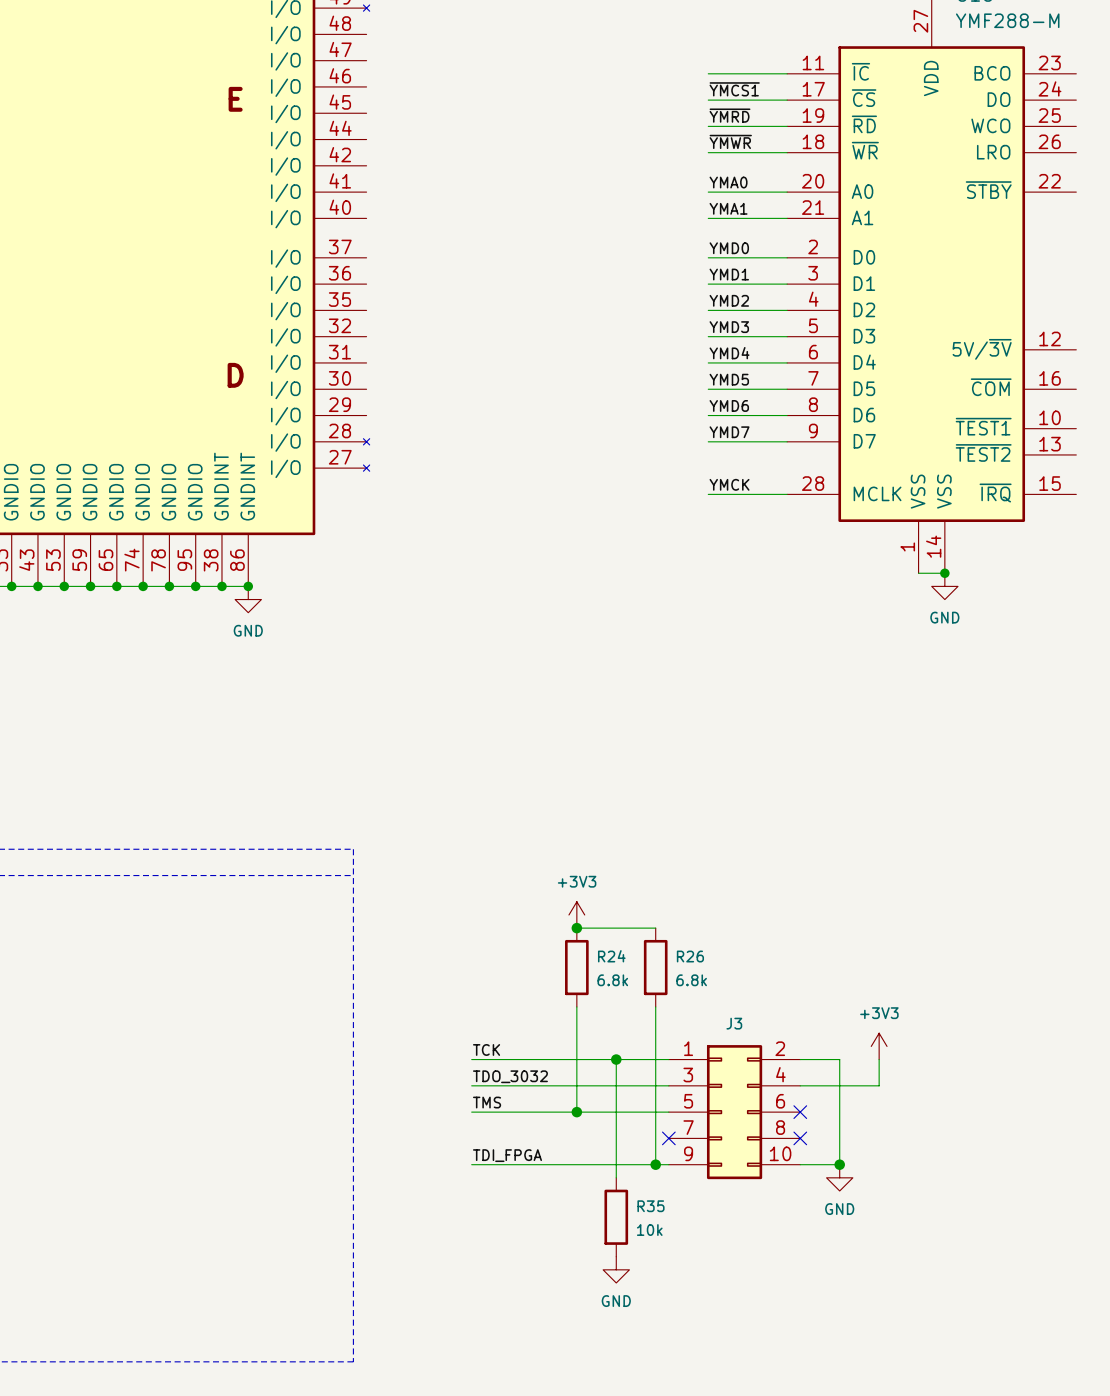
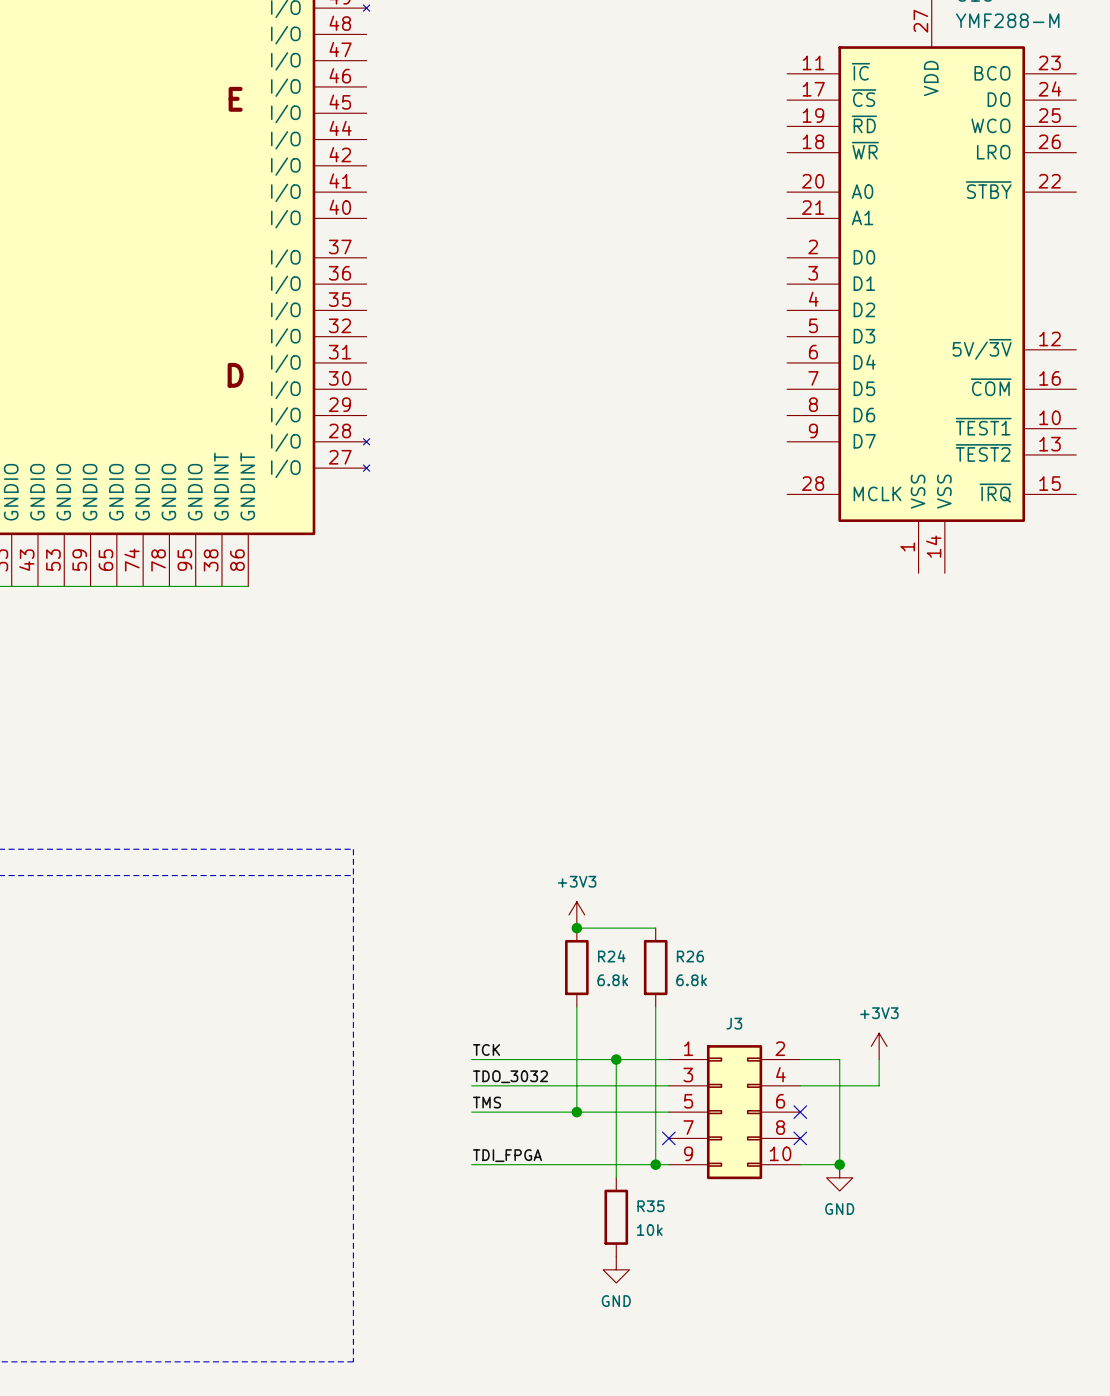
wire: (708, 73) (787, 73) -> none
label: ~{YMCS1} (734, 89) -> none
wire: (708, 100) (787, 100) -> none
label: ~{YMRD} (729, 115) -> none
wire: (708, 126) (787, 126) -> none
label: ~{YMWR} (730, 141) -> none
wire: (708, 152) (787, 152) -> none
label: YMA0 (728, 182) -> none
wire: (708, 192) (787, 192) -> none
label: YMA1 (728, 208) -> none
wire: (708, 218) (787, 218) -> none
label: YMD0 (729, 248) -> none
wire: (708, 257) (787, 257) -> none
label: YMD1 (729, 274) -> none
wire: (708, 284) (787, 284) -> none
label: YMD2 (729, 300) -> none
wire: (708, 310) (787, 310) -> none
label: YMD3 (729, 327) -> none
wire: (708, 336) (787, 336) -> none
label: YMD4 (729, 353) -> none
wire: (708, 362) (787, 362) -> none
label: YMD5 (729, 379) -> none
wire: (708, 389) (787, 389) -> none
label: YMD6 (729, 405) -> none
wire: (708, 415) (787, 415) -> none
label: YMD7 (729, 432) -> none
wire: (708, 441) (787, 441) -> none
label: YMCK (729, 484) -> none
wire: (708, 494) (787, 494) -> none
wire: (918, 573) (944, 573) -> none
junction: (944, 573) -> none
junction: (11, 586) -> none
junction: (37, 586) -> none
junction: (64, 586) -> none
junction: (90, 586) -> none
junction: (116, 586) -> none
junction: (143, 586) -> none
junction: (169, 586) -> none
junction: (195, 586) -> none
junction: (221, 586) -> none
junction: (248, 586) -> none
power symbol: GND (944, 586) -> none
power symbol: GND (248, 599) -> none

